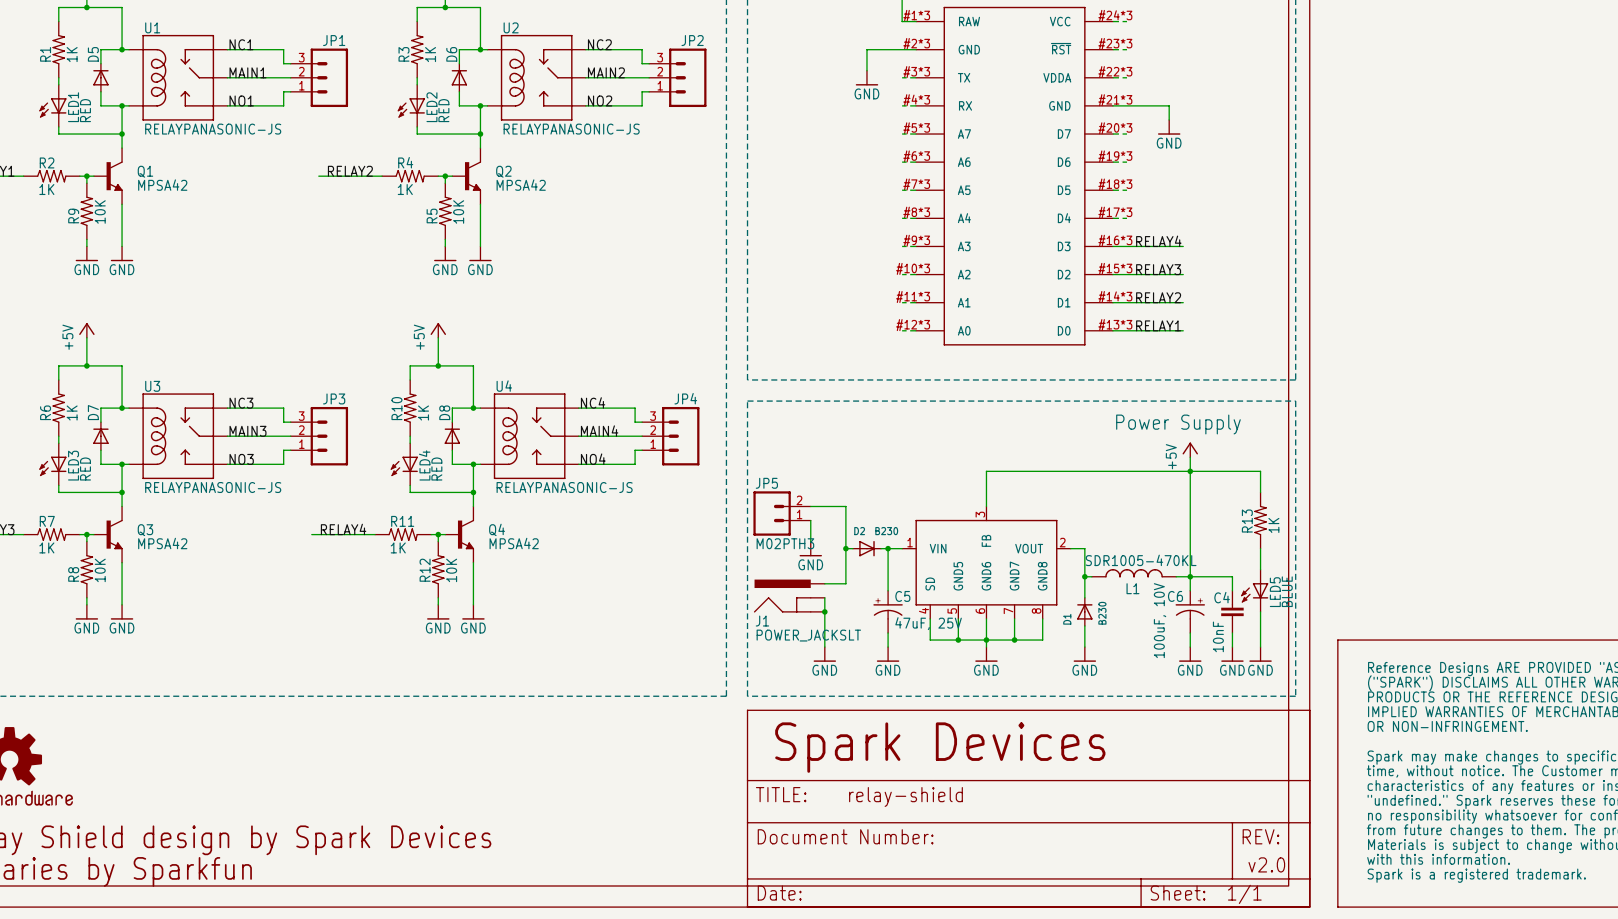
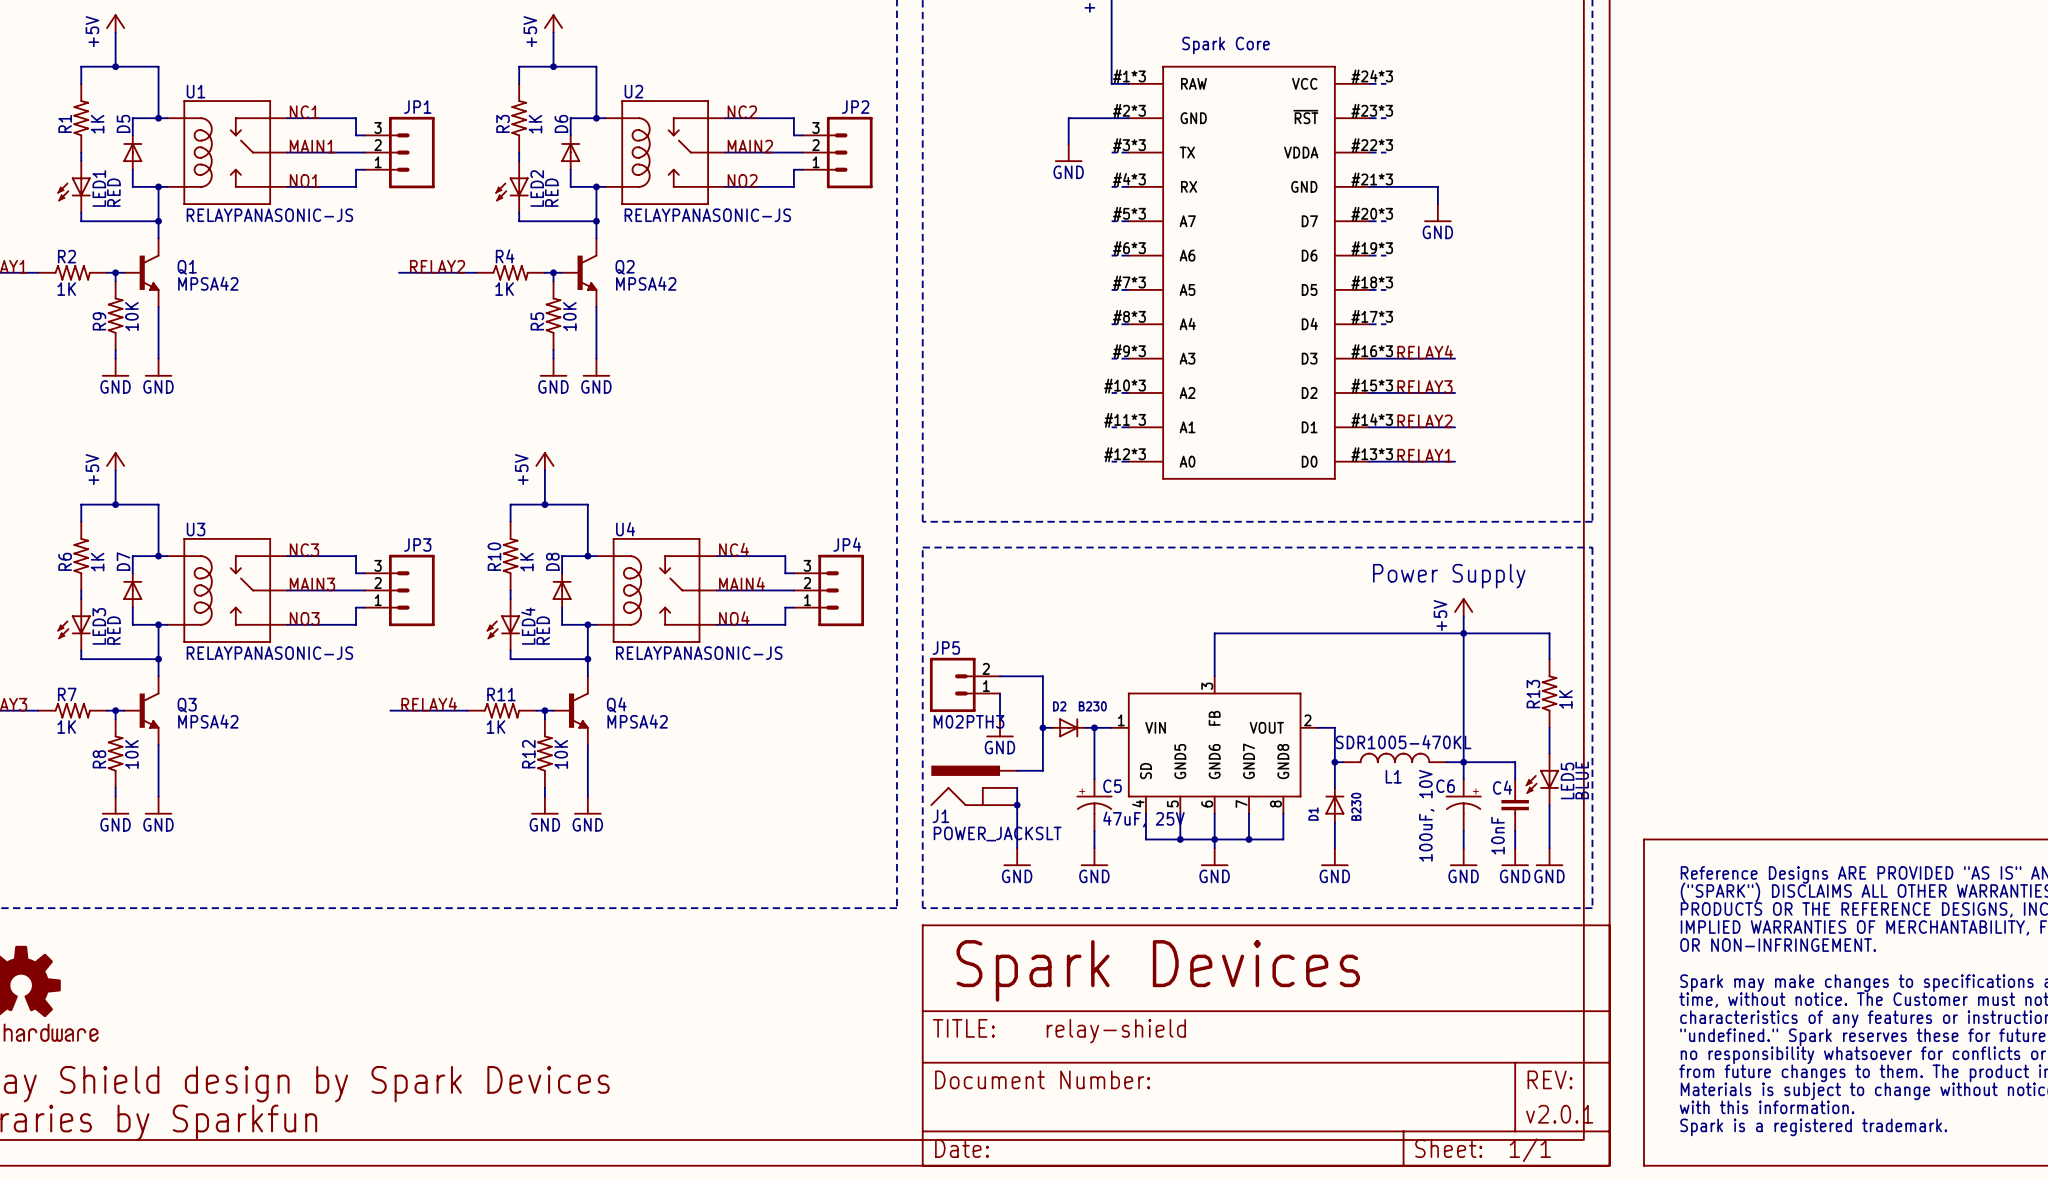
text: v2.0 (1266, 864) -> v2.0.1 (1559, 1114)

